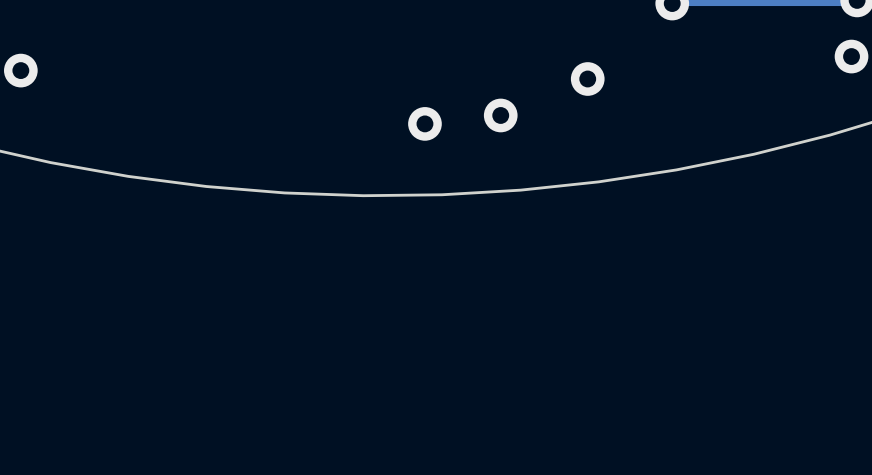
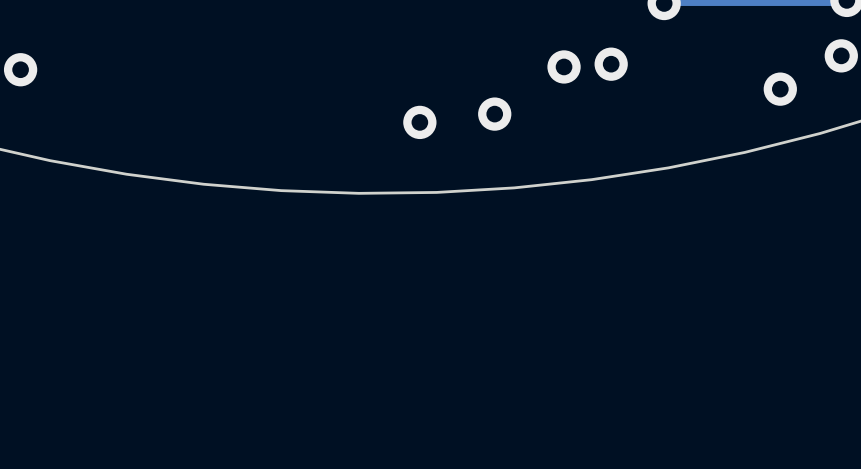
via: none -> (611, 64)
via: none -> (564, 66)
via: (587, 79) -> none
via: none -> (780, 89)

